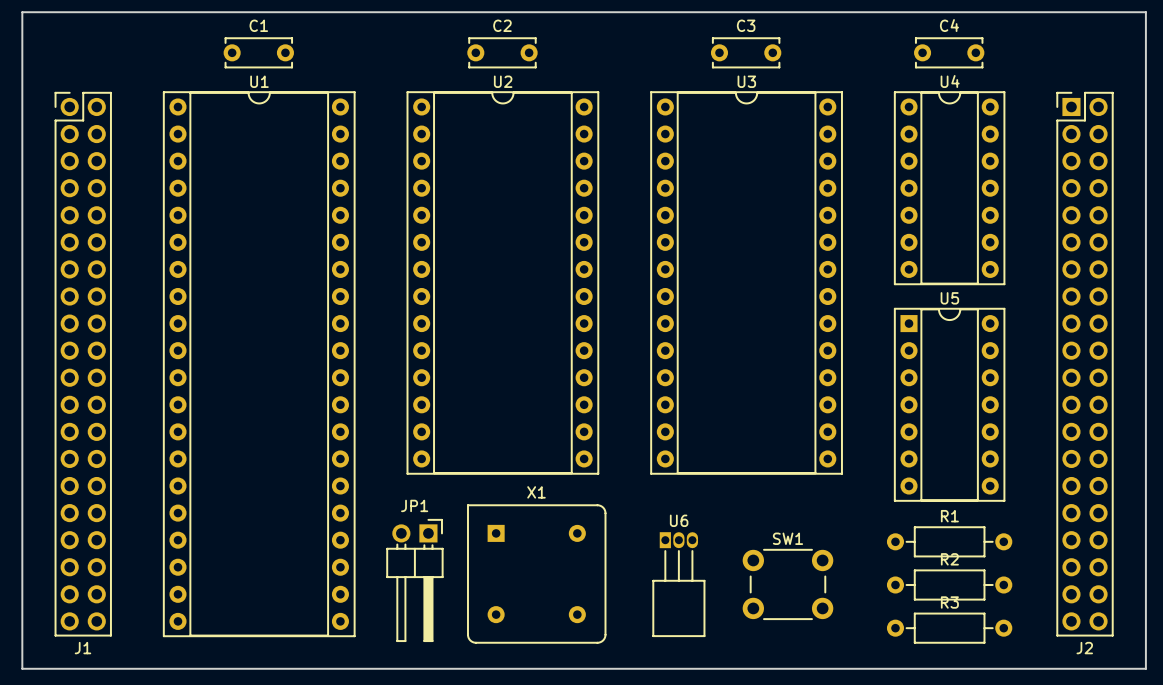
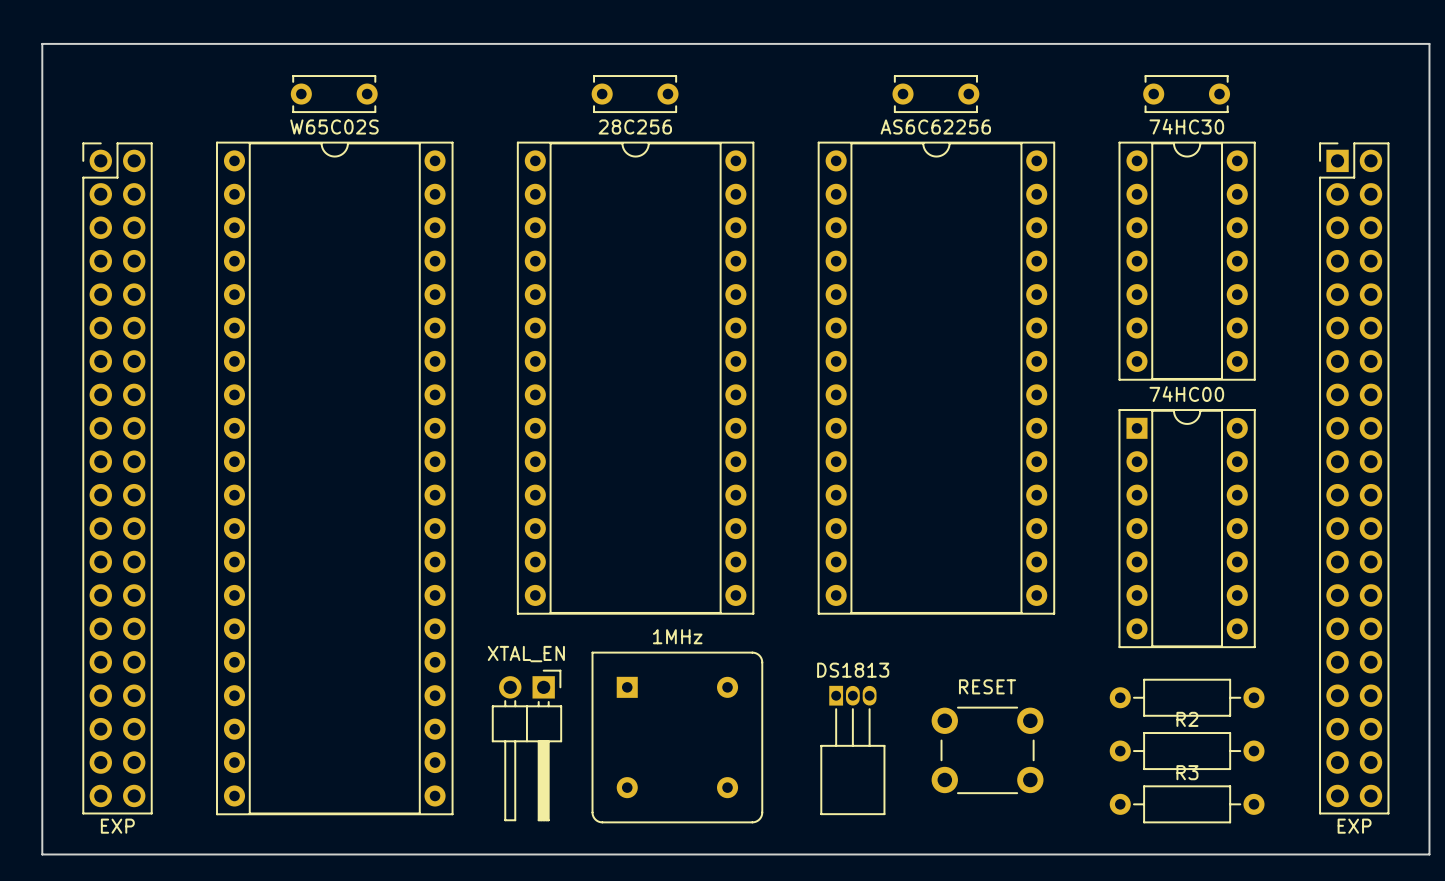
C1 name: C1 (258, 25) -> none
C2 name: C2 (502, 25) -> none
C3 name: C3 (746, 25) -> none
C4 name: C4 (949, 25) -> none
U1 value: none -> W65C02S (334, 126)
U2 value: none -> 28C256 (635, 126)
U3 value: none -> AS6C62256 (935, 126)
U4 value: none -> 74HC30 (1186, 126)
U1 name: U1 (259, 81) -> none
U2 name: U2 (503, 81) -> none
U3 name: U3 (746, 81) -> none
U4 name: U4 (950, 81) -> none
U5 value: none -> 74HC00 (1186, 394)
U5 name: U5 (949, 298) -> none
X1 name: X1 (536, 492) -> none
X1 value: none -> 1MHz (677, 636)
JP1 name: JP1 (414, 505) -> none
JP1 value: none -> XTAL_EN (526, 654)
R1 name: R1 (949, 516) -> none
U6 value: none -> DS1813 (853, 670)
U6 name: U6 (679, 520) -> none
SW1 value: none -> RESET (987, 686)
SW1 name: SW1 (787, 538) -> none
J1 value: none -> EXP (117, 826)
J2 value: none -> EXP (1354, 826)
J1 name: J1 (82, 648) -> none
J2 name: J2 (1084, 648) -> none

